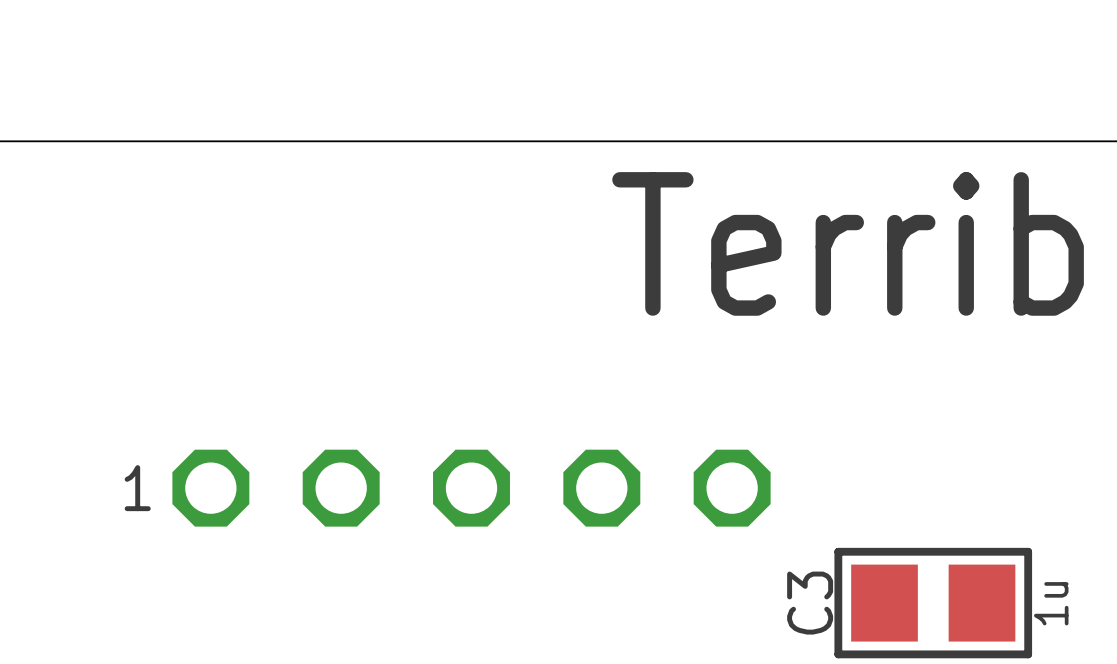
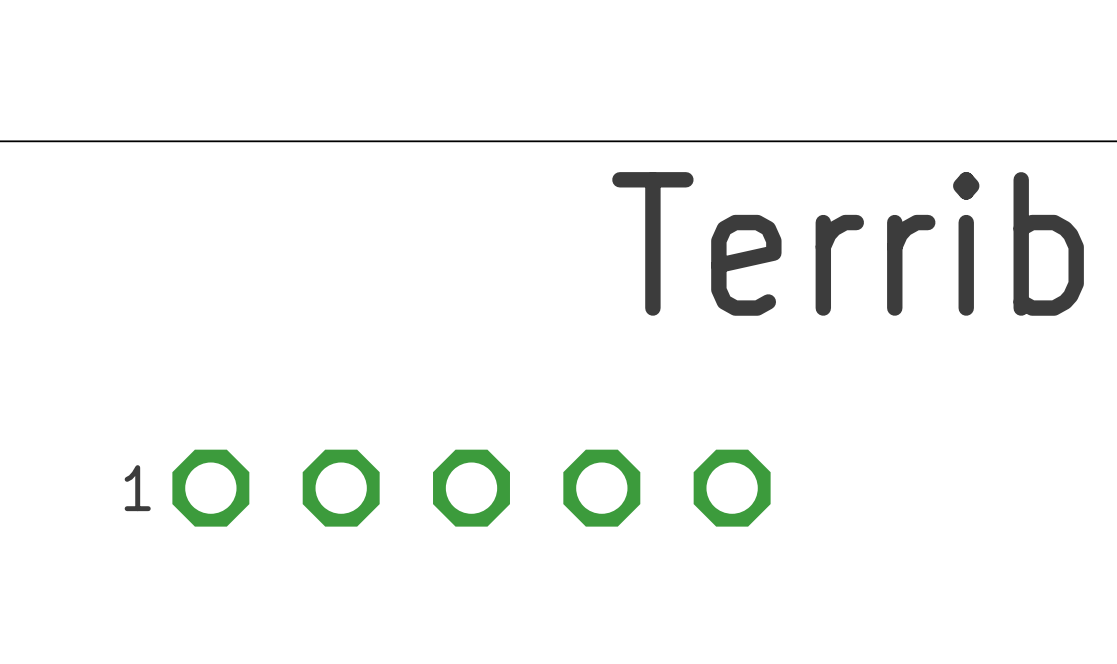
C3: 1u (933, 603) -> none

